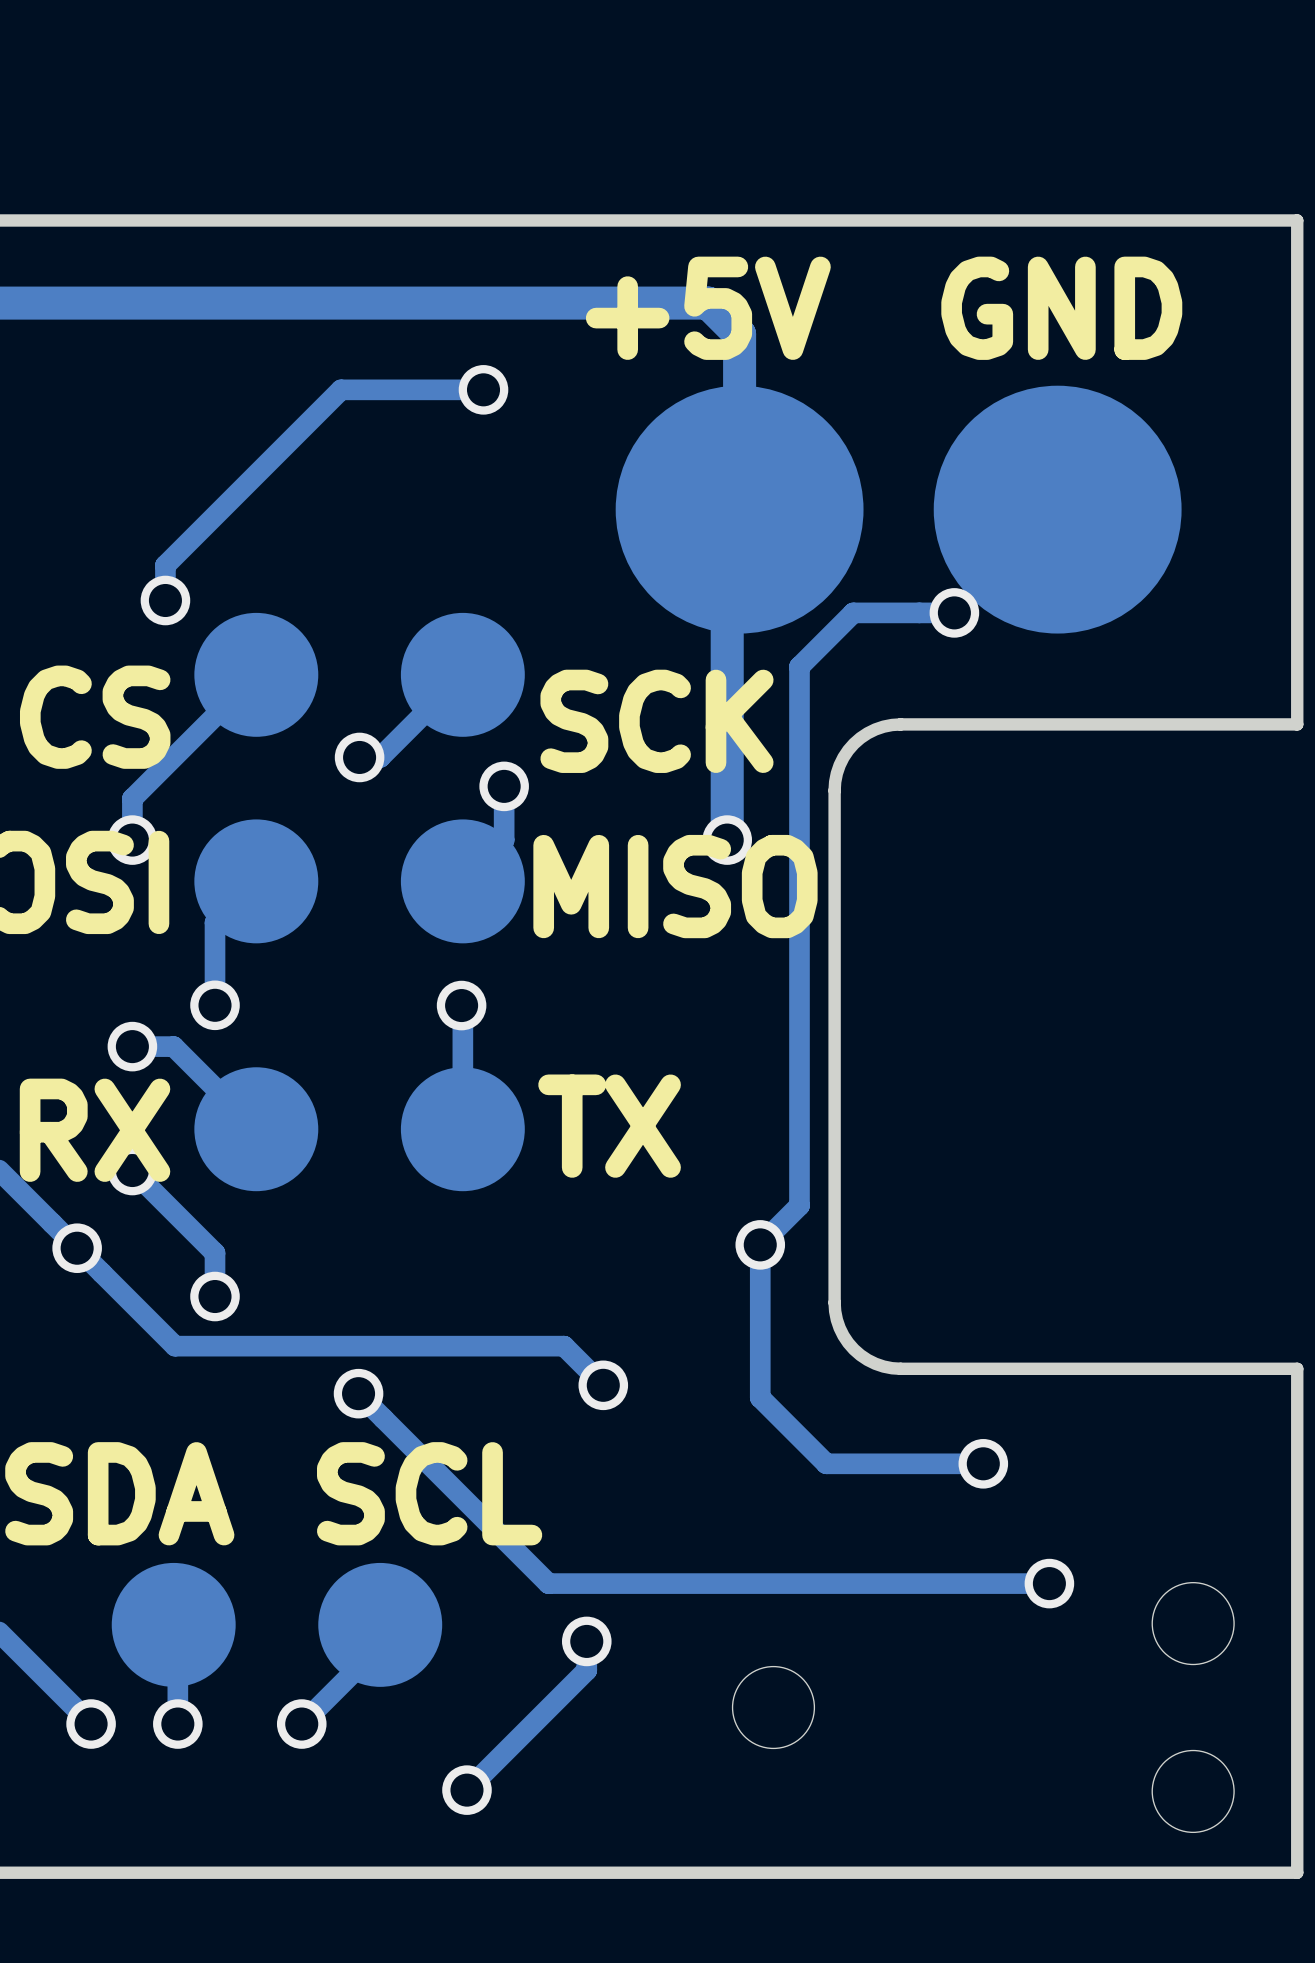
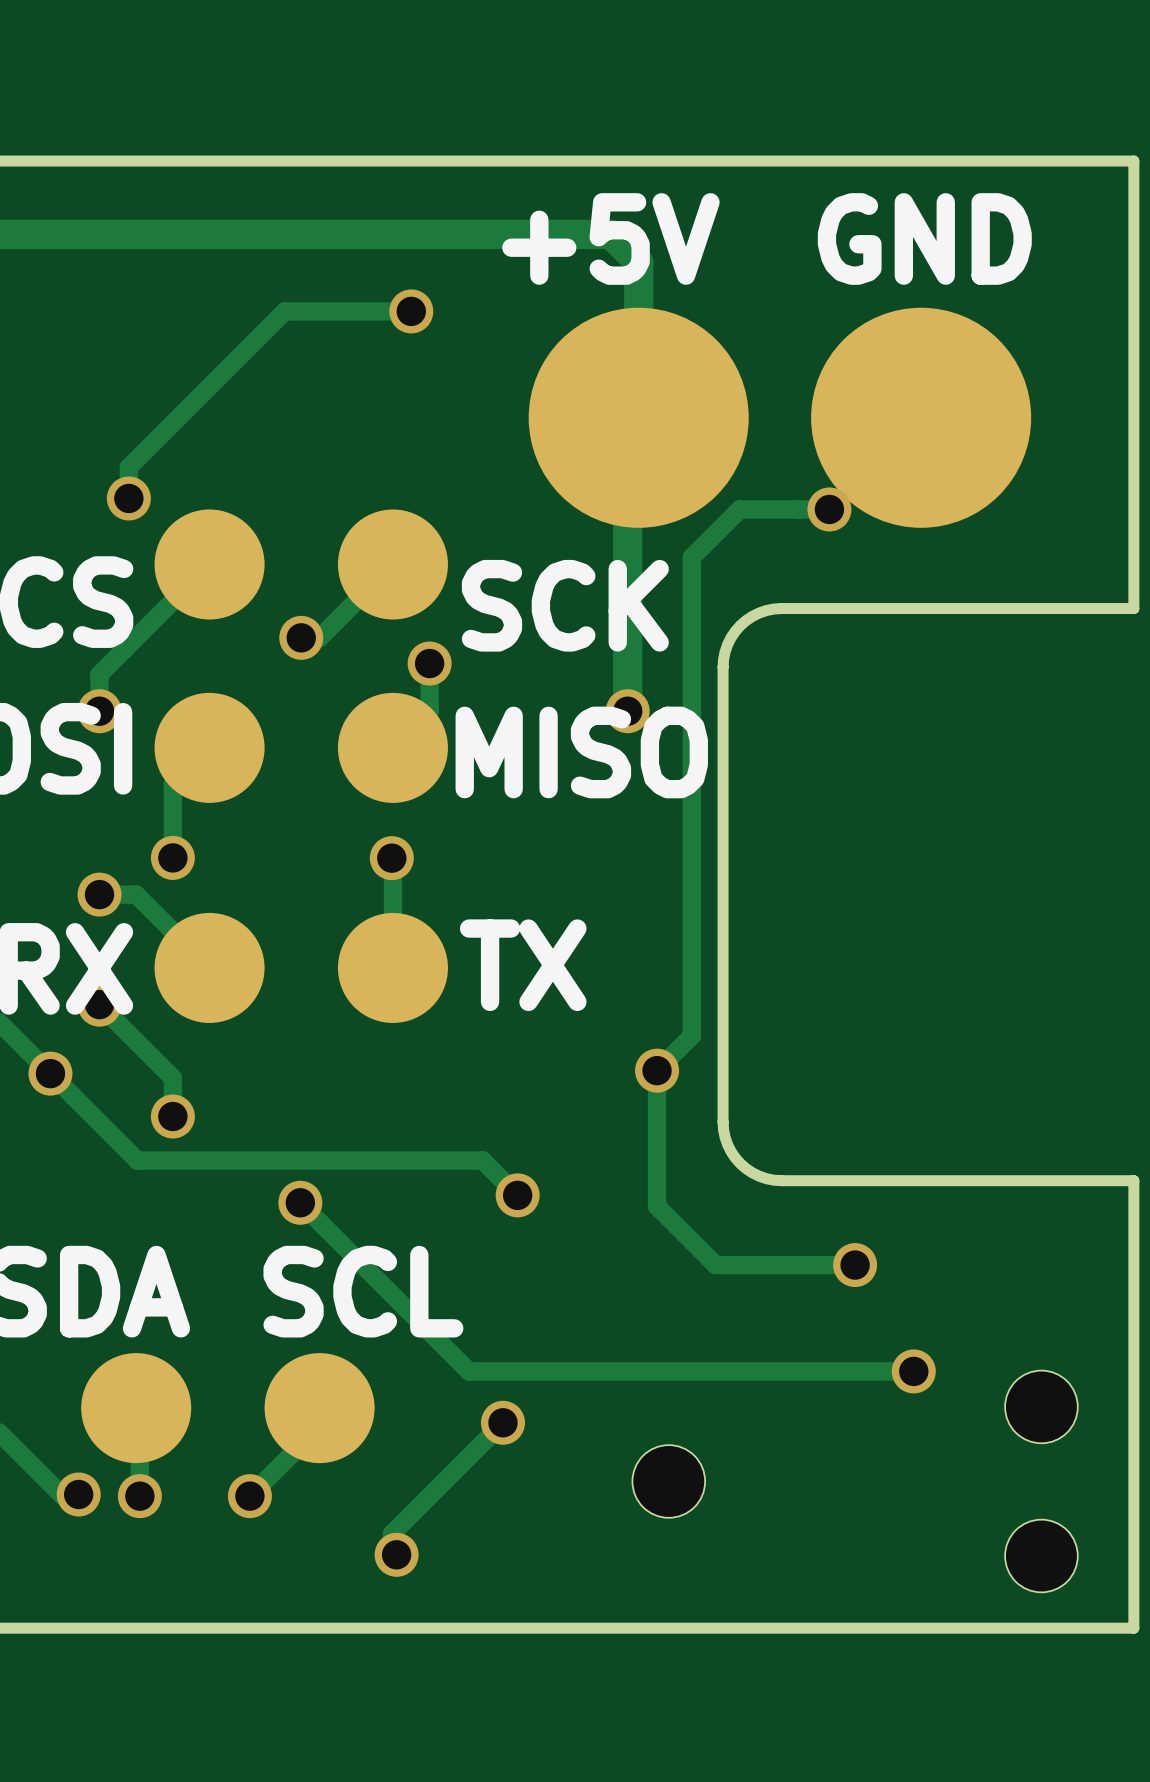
track: (586, 1641) (586, 1670) (466, 1790) -> (502, 1422) (391, 1533) (391, 1559)
via position: (91, 1724) -> (78, 1494)

